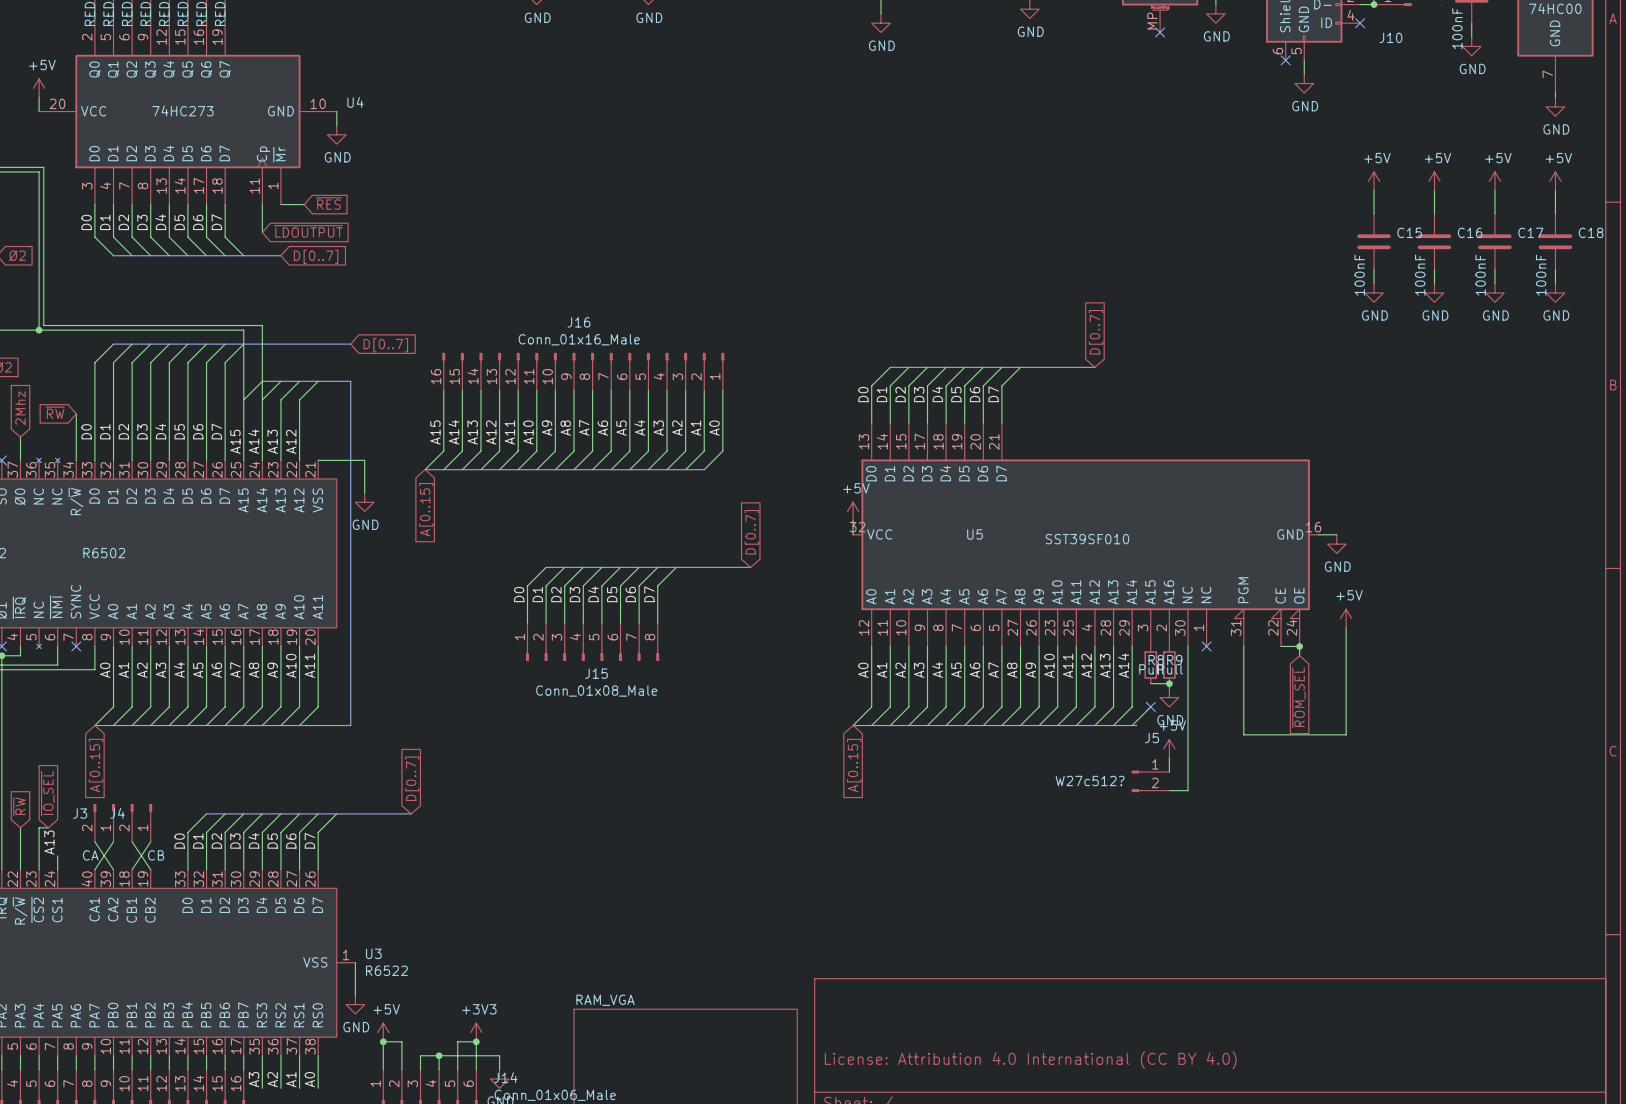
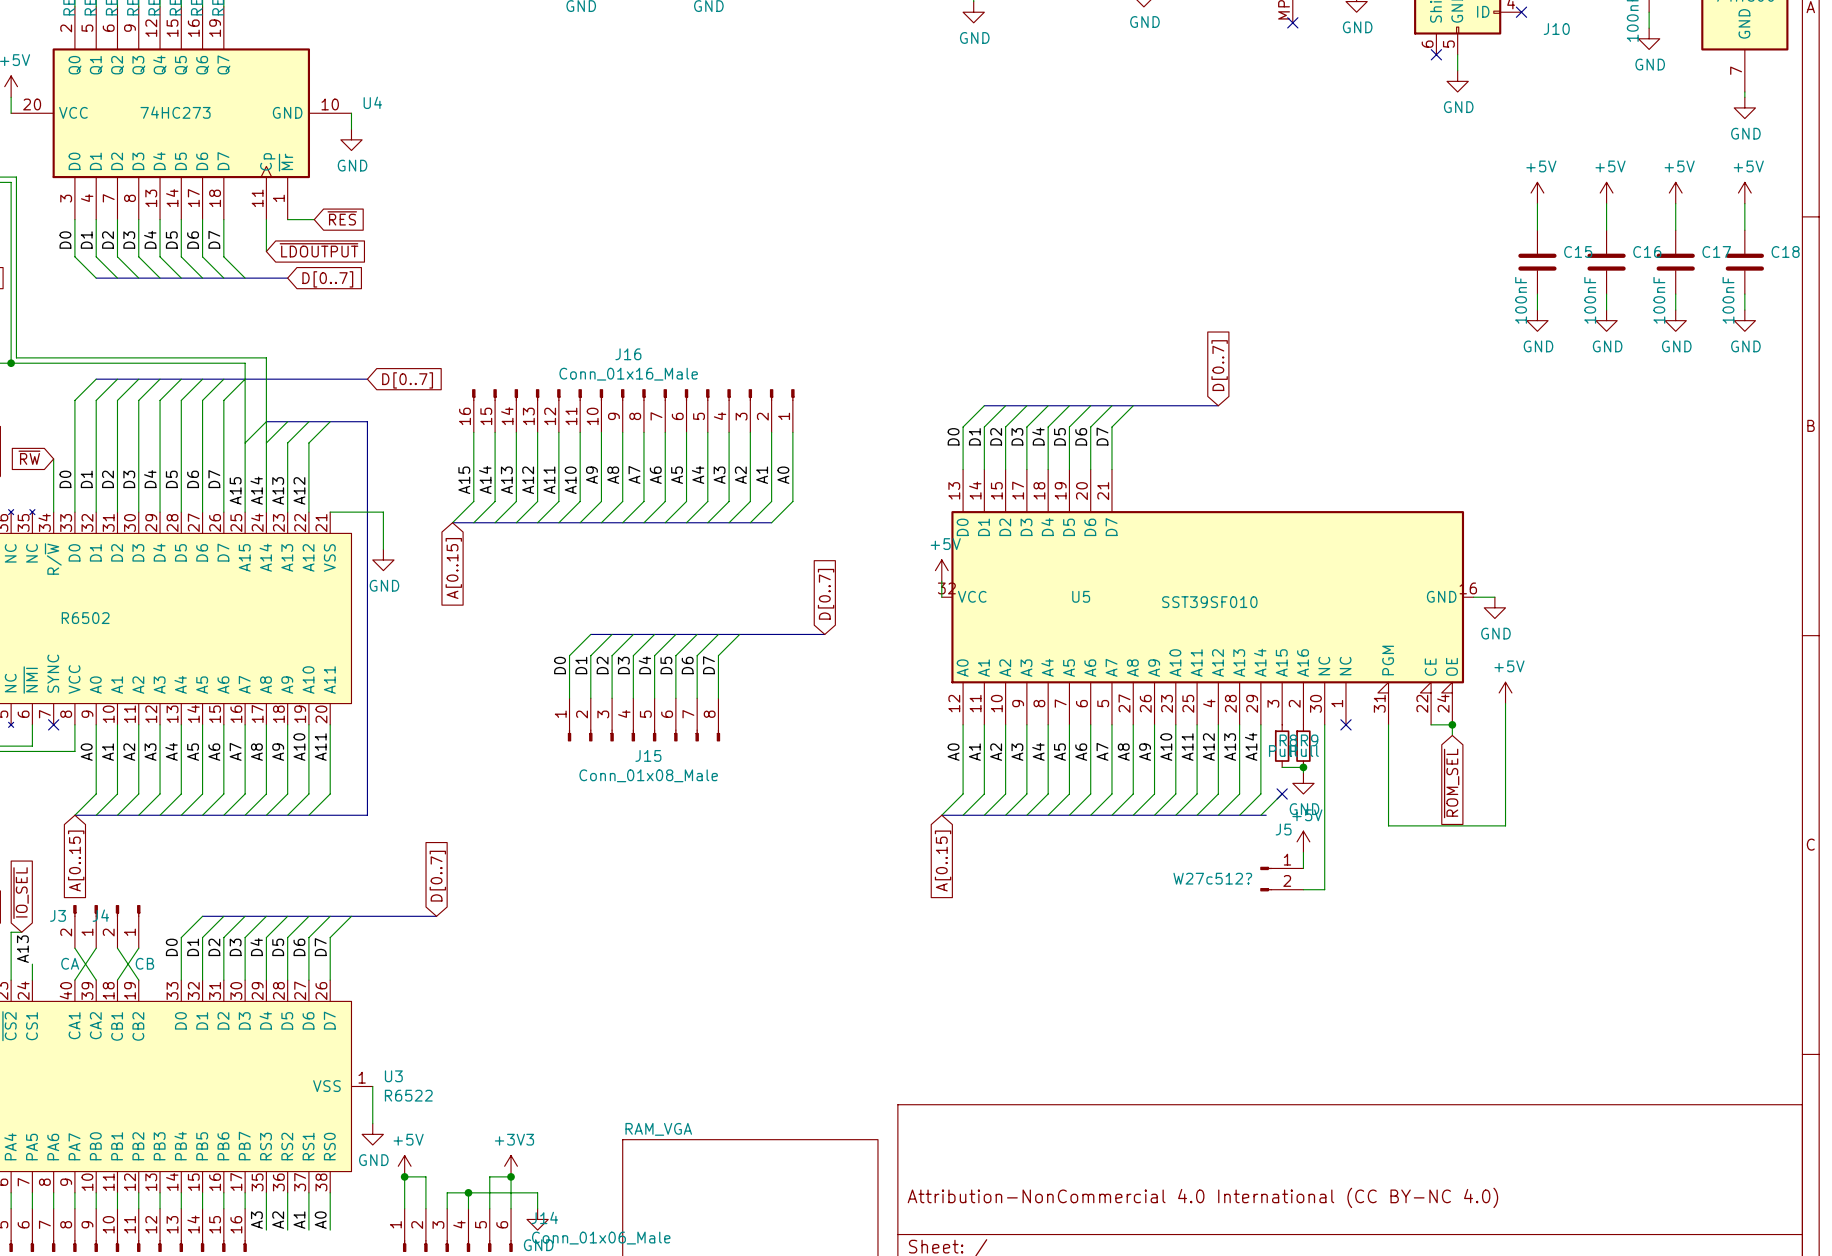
title block: License: Attribution 4.0 International (CC BY 4.0) (1030, 1060) -> Attribution-NonCommercial 4.0 International (CC BY-NC 4.0) (1202, 1197)

